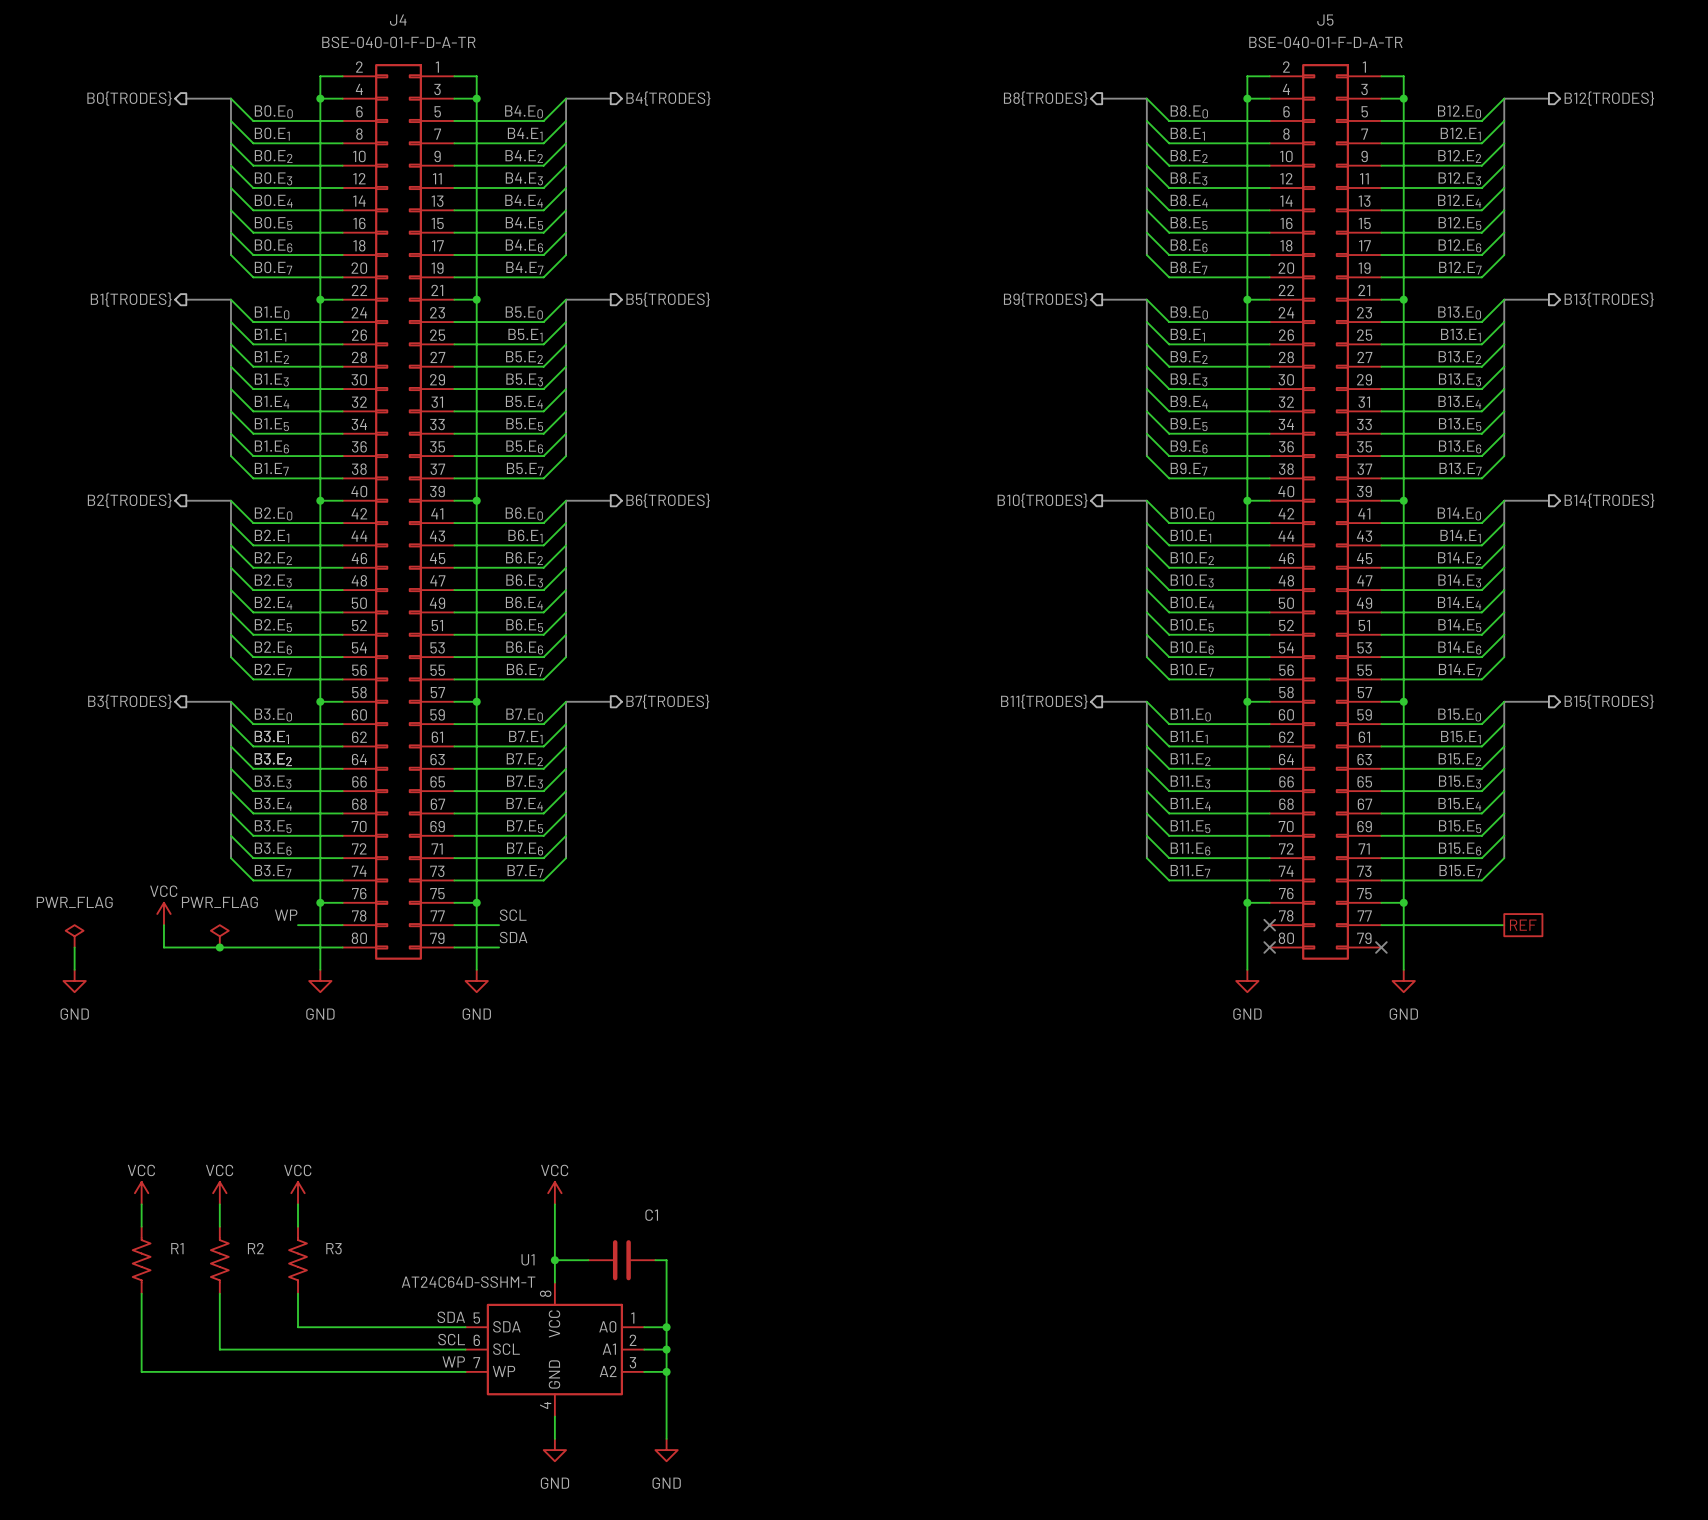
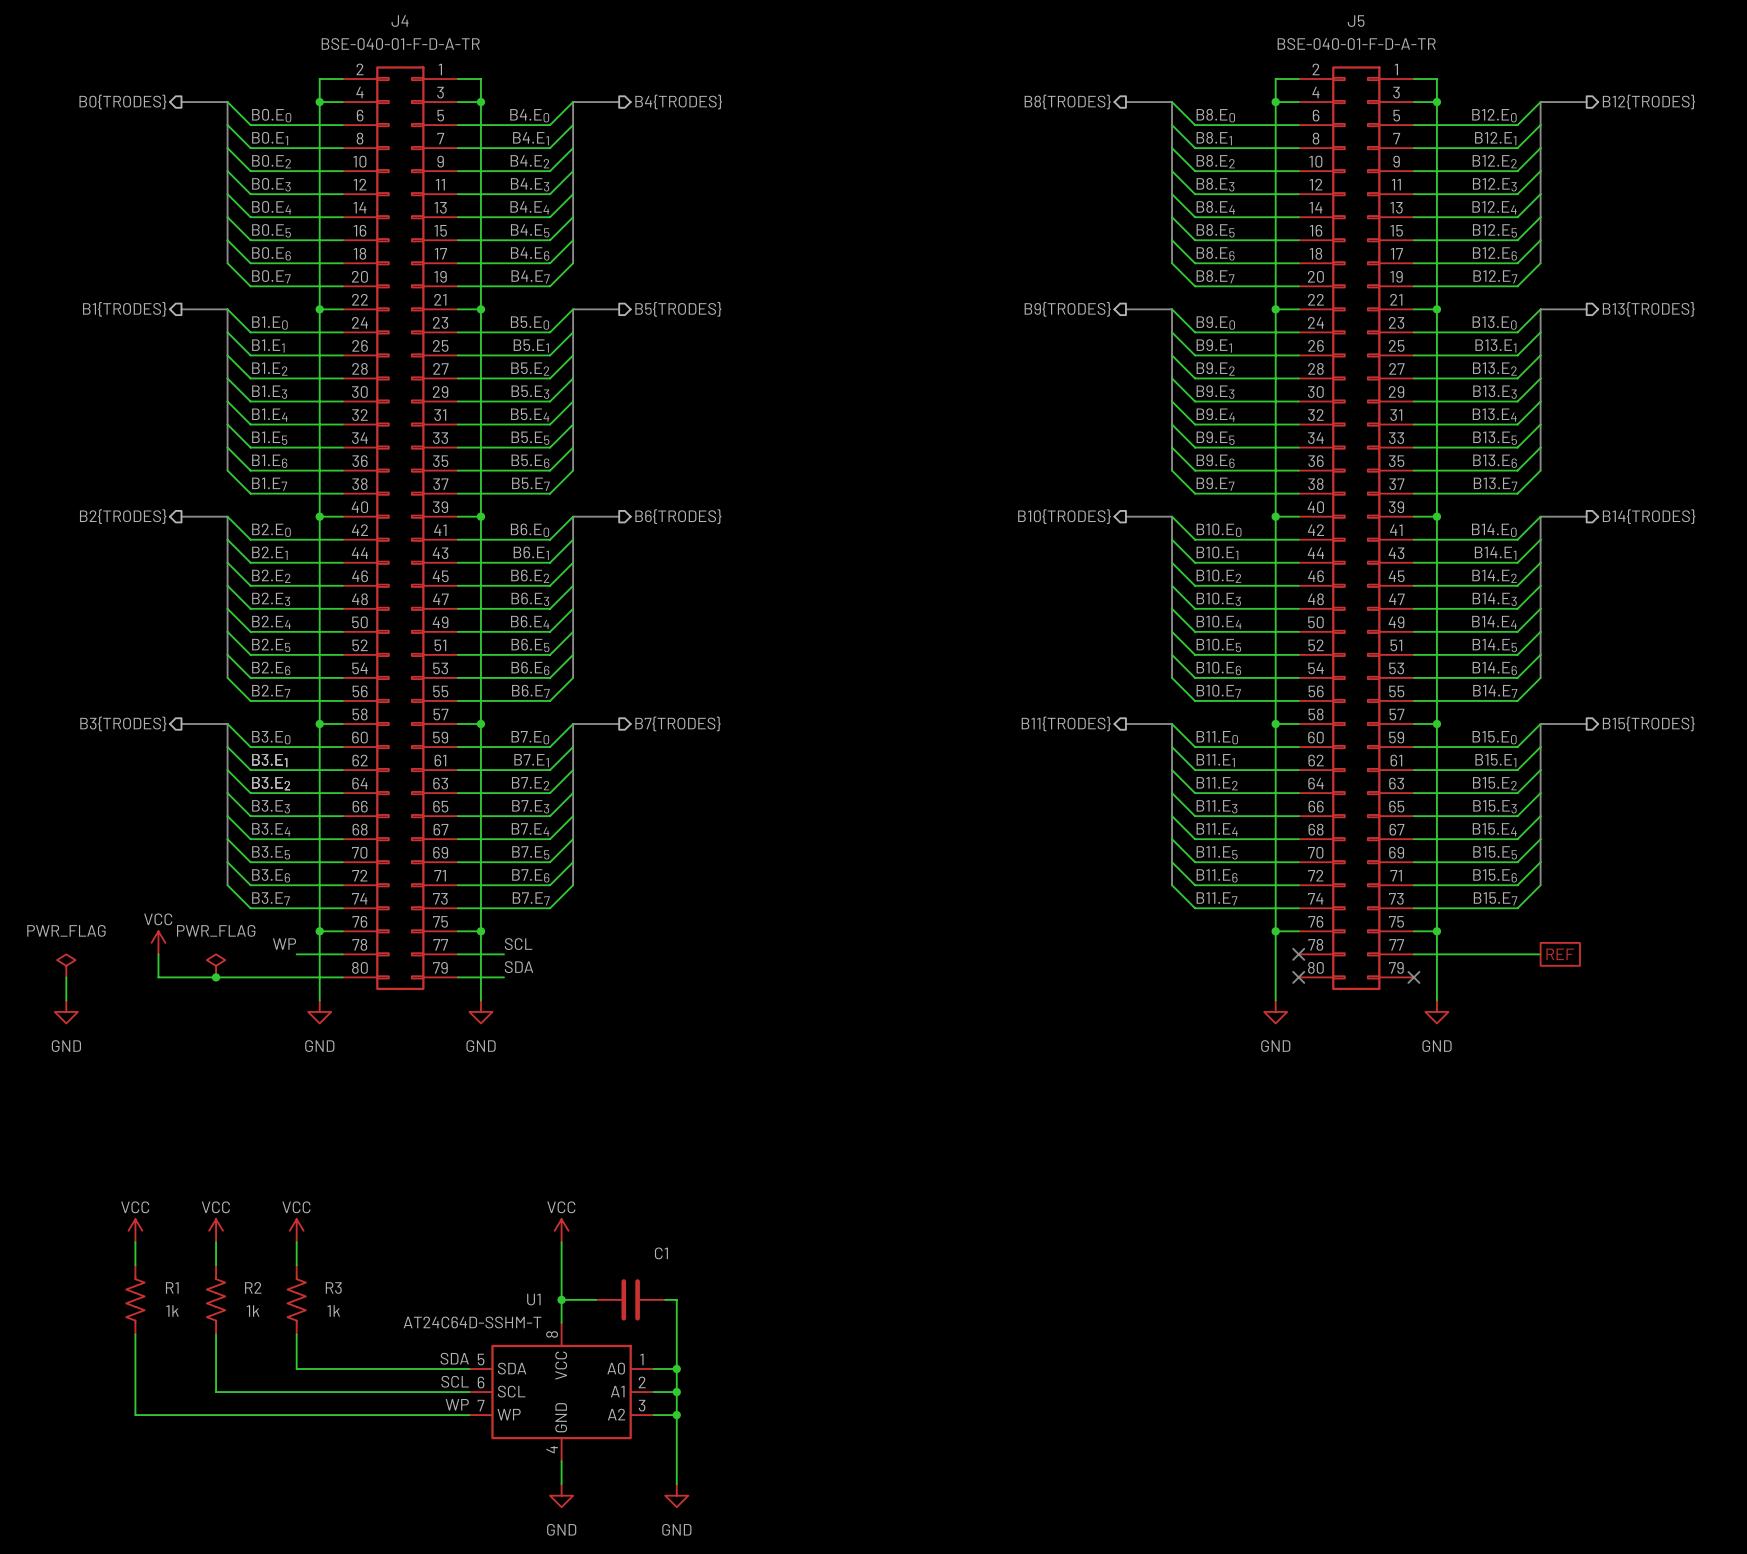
R1 value: none -> 1k (172, 1310)
R2 value: none -> 1k (253, 1310)
R3 value: none -> 1k (333, 1310)

